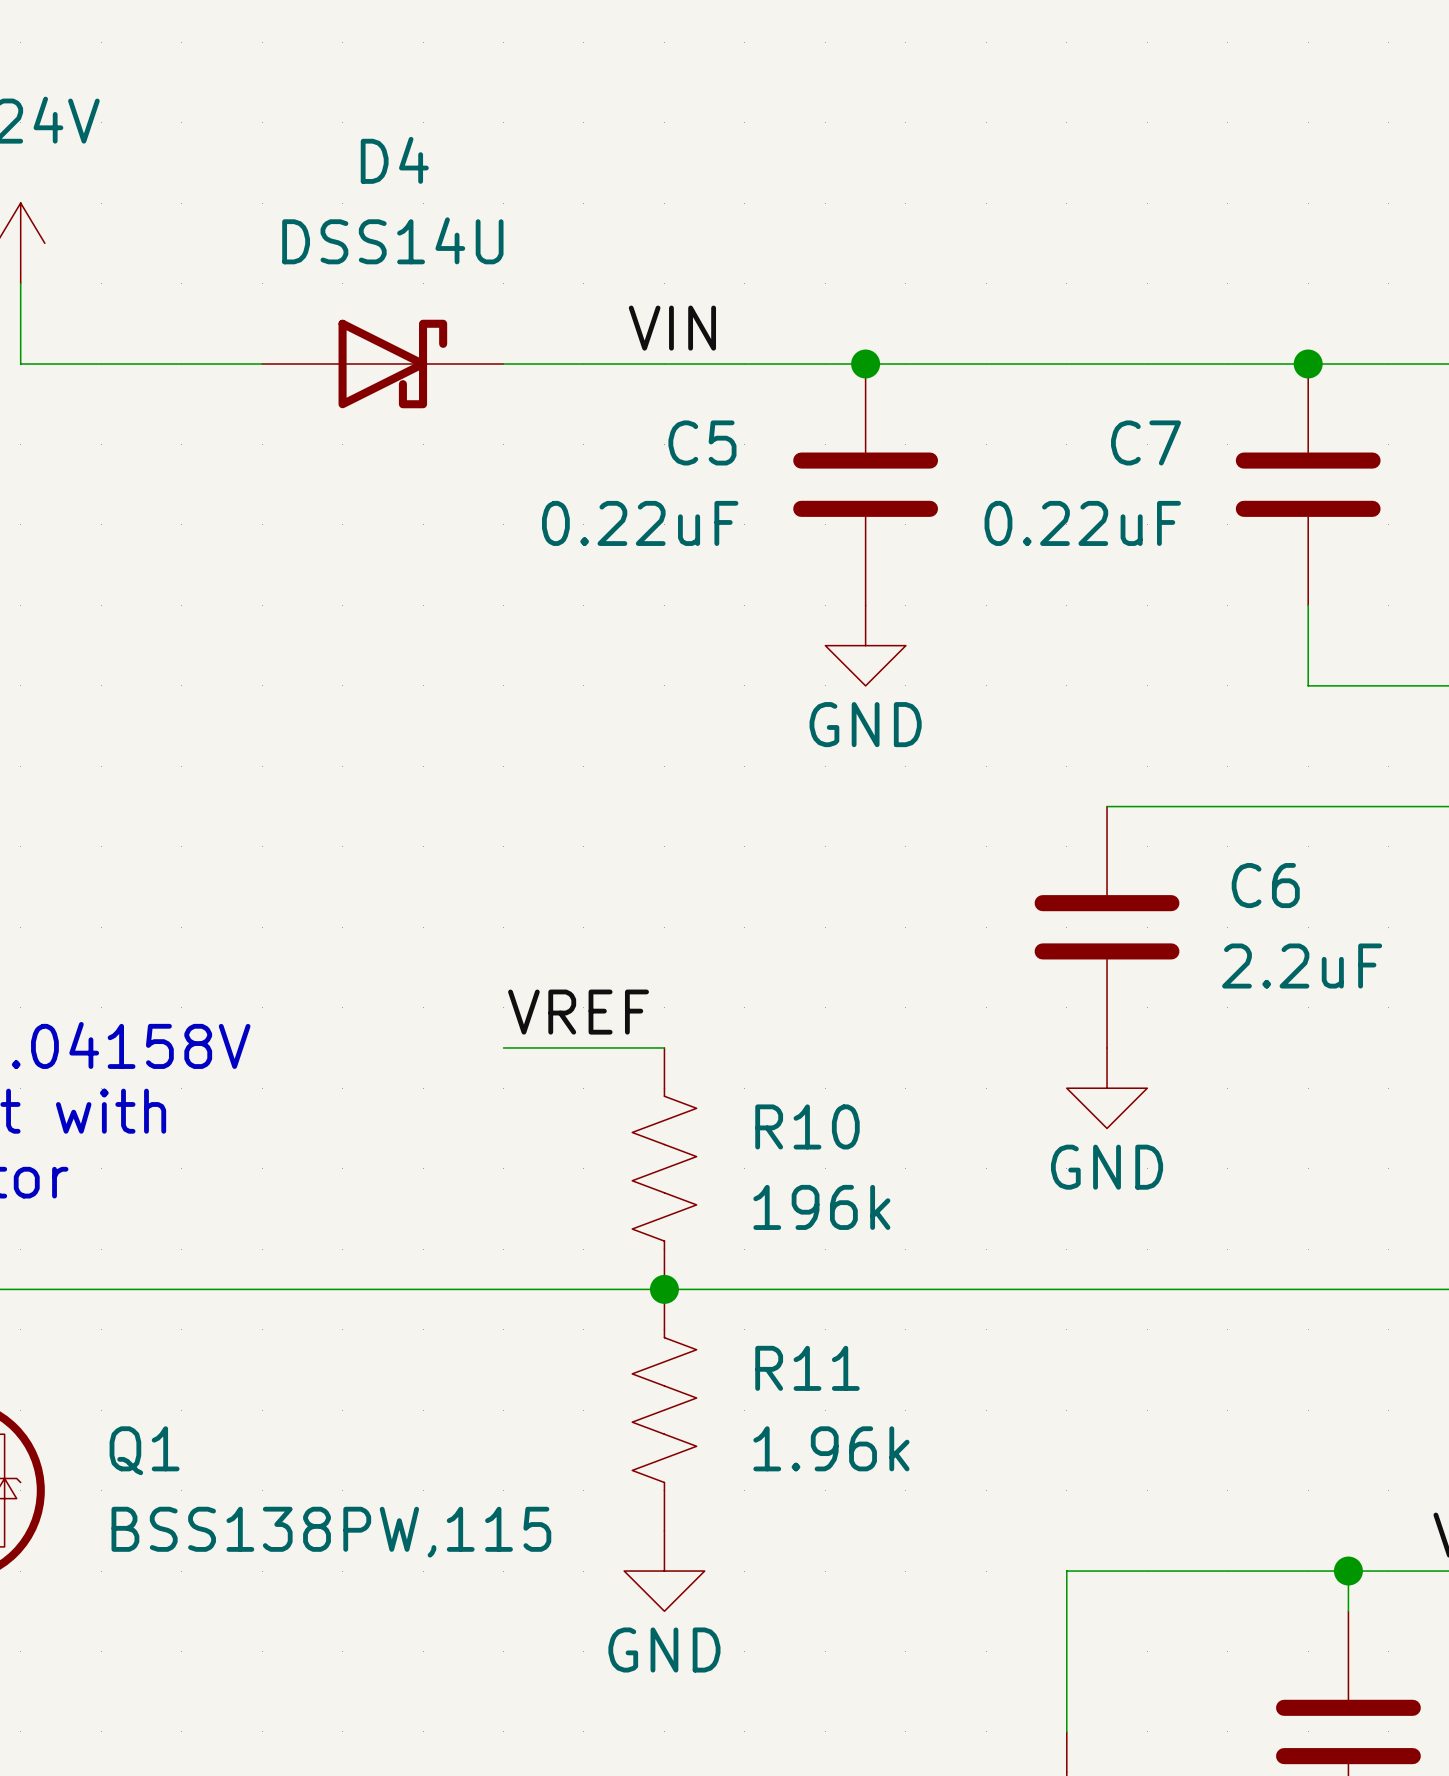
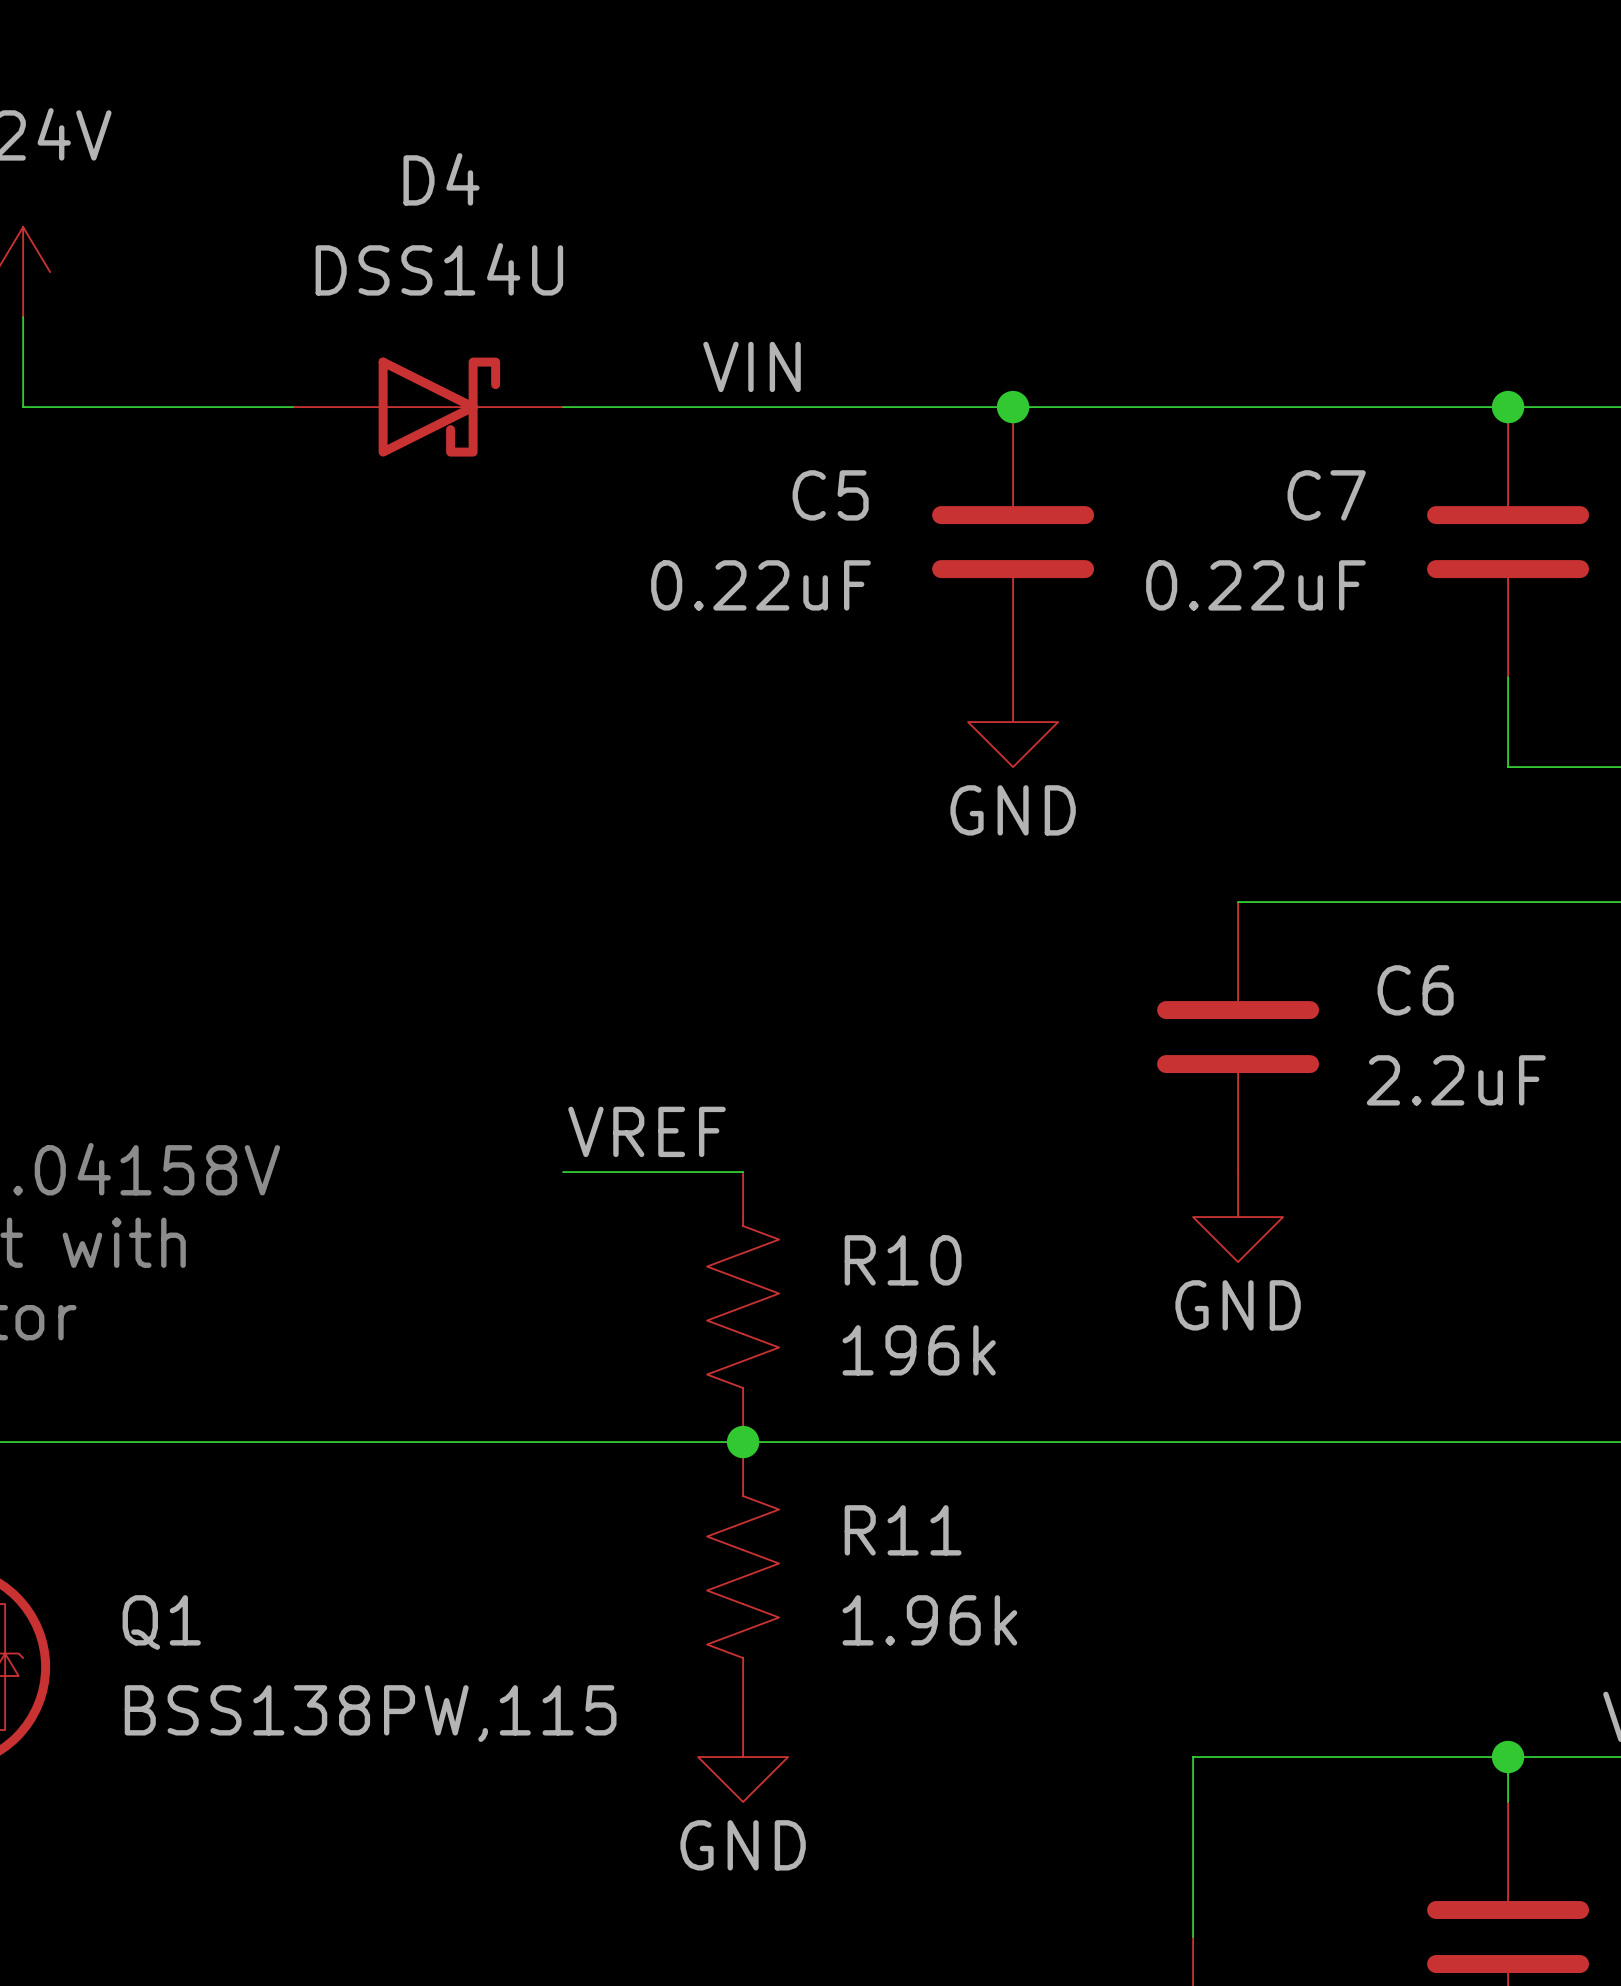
junction position: (865, 364) -> (1013, 407)
junction position: (1308, 364) -> (1508, 407)
C5 position: (865, 484) -> (1013, 542)
C7 position: (1308, 484) -> (1508, 542)
wire: (1308, 605) (1308, 685) (1348, 685) -> (1508, 677) (1508, 767)
power symbol position: GND (865, 645) -> GND (1013, 722)

